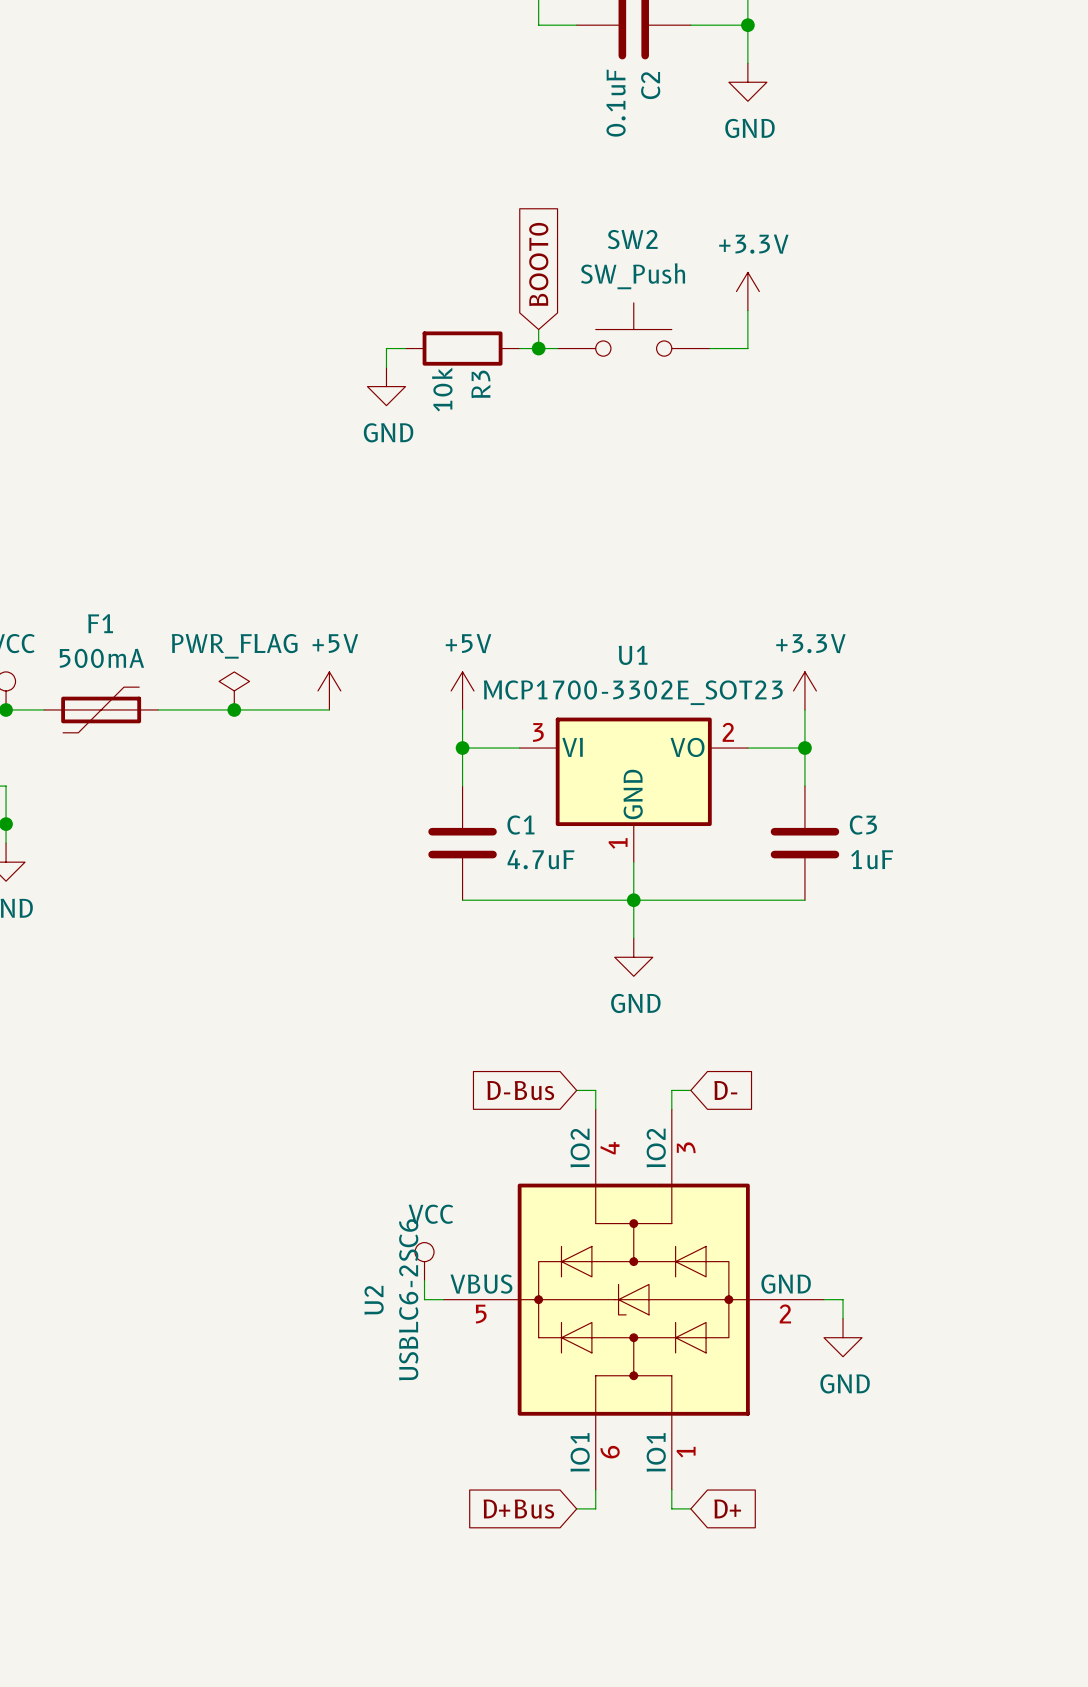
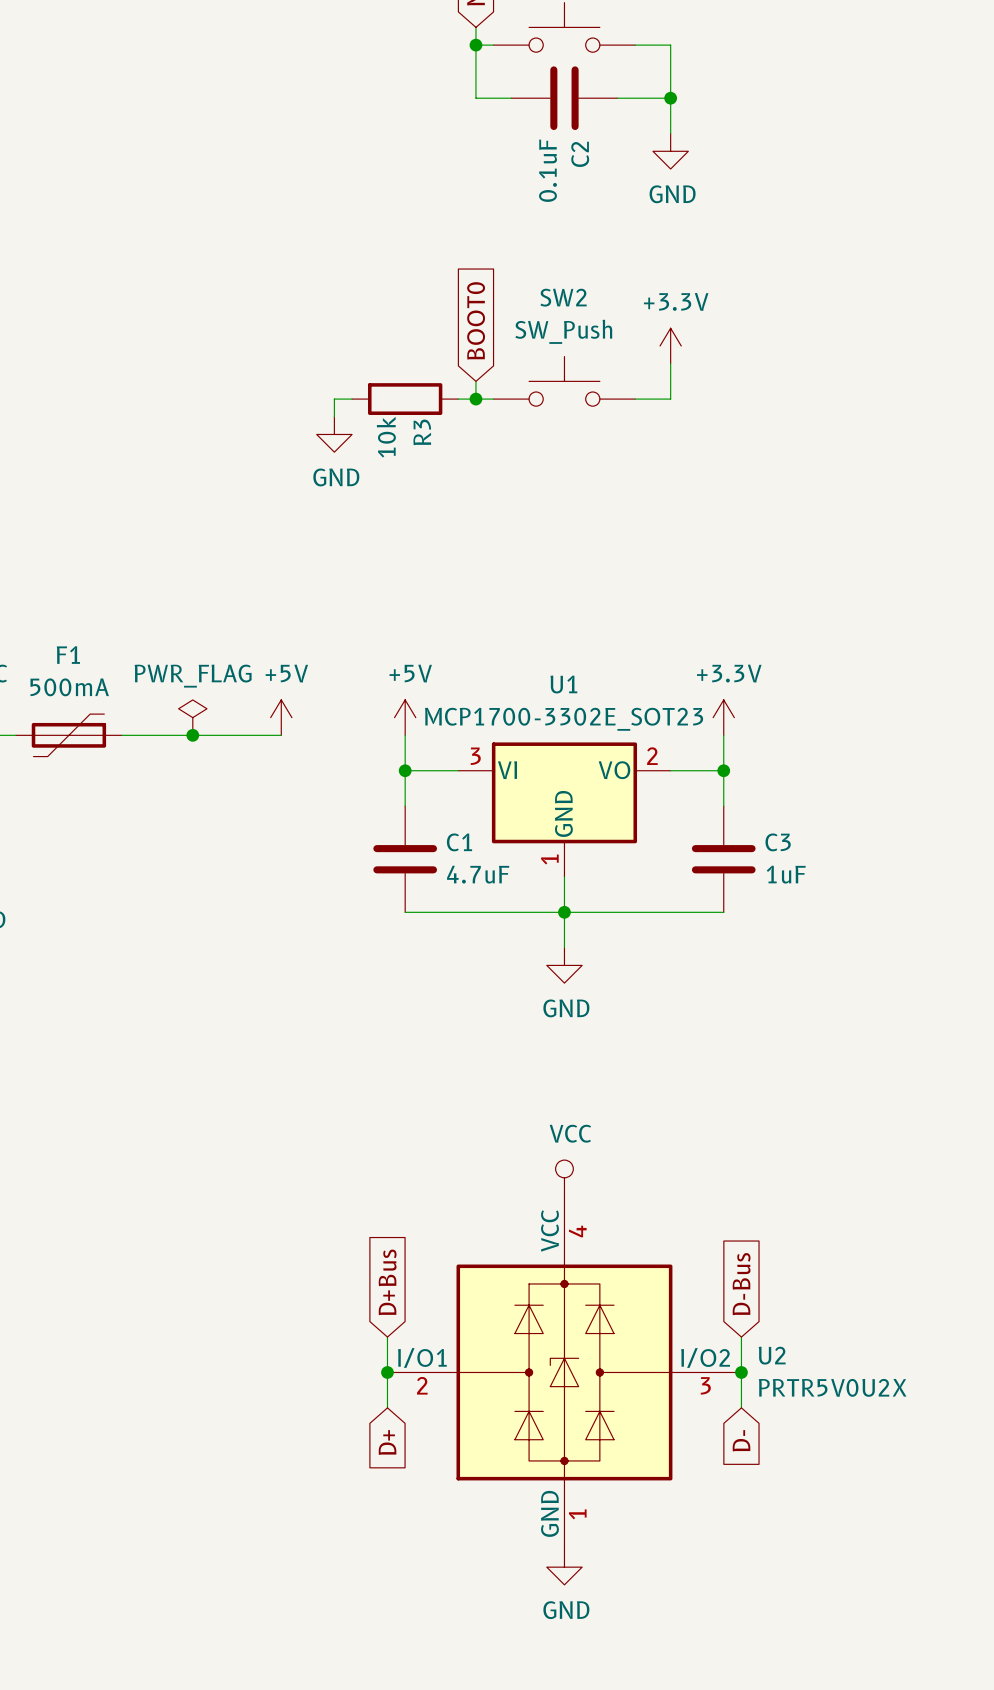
global label rotation: 0° (520, 1090) -> 90° clockwise (741, 1284)
global label position: D-Bus (520, 1090) -> D-Bus (741, 1284)
wire: (576, 1090) (595, 1090) (595, 1109) -> none
wire: (690, 1090) (671, 1090) (671, 1109) -> none
global label rotation: 0° (725, 1090) -> 90° clockwise (741, 1440)
global label position: D- (725, 1090) -> D- (741, 1440)
U2 symbol: [443, 1109, 824, 1490] -> [387, 1195, 742, 1550]
power symbol position: VCC (424, 1261) -> VCC (564, 1177)
wire: (424, 1280) (424, 1299) (443, 1299) -> none
U2 value: USBLC6-2SC6 (408, 1299) -> PRTR5V0U2X (832, 1387)
wire: (823, 1299) (843, 1299) (843, 1318) -> none
U2 name position: U2 (374, 1300) -> U2 (772, 1355)
power symbol position: GND (843, 1337) -> GND (564, 1567)
wire: none -> (387, 1337) (387, 1407)
wire: none -> (741, 1337) (741, 1407)
junction: none -> (387, 1372)
junction: none -> (741, 1372)
global label rotation: 0° (727, 1508) -> 90° clockwise (387, 1442)
global label position: D+ (727, 1508) -> D+ (387, 1442)
global label rotation: 0° (518, 1509) -> 90° clockwise (387, 1282)
global label position: D+Bus (518, 1509) -> D+Bus (387, 1282)

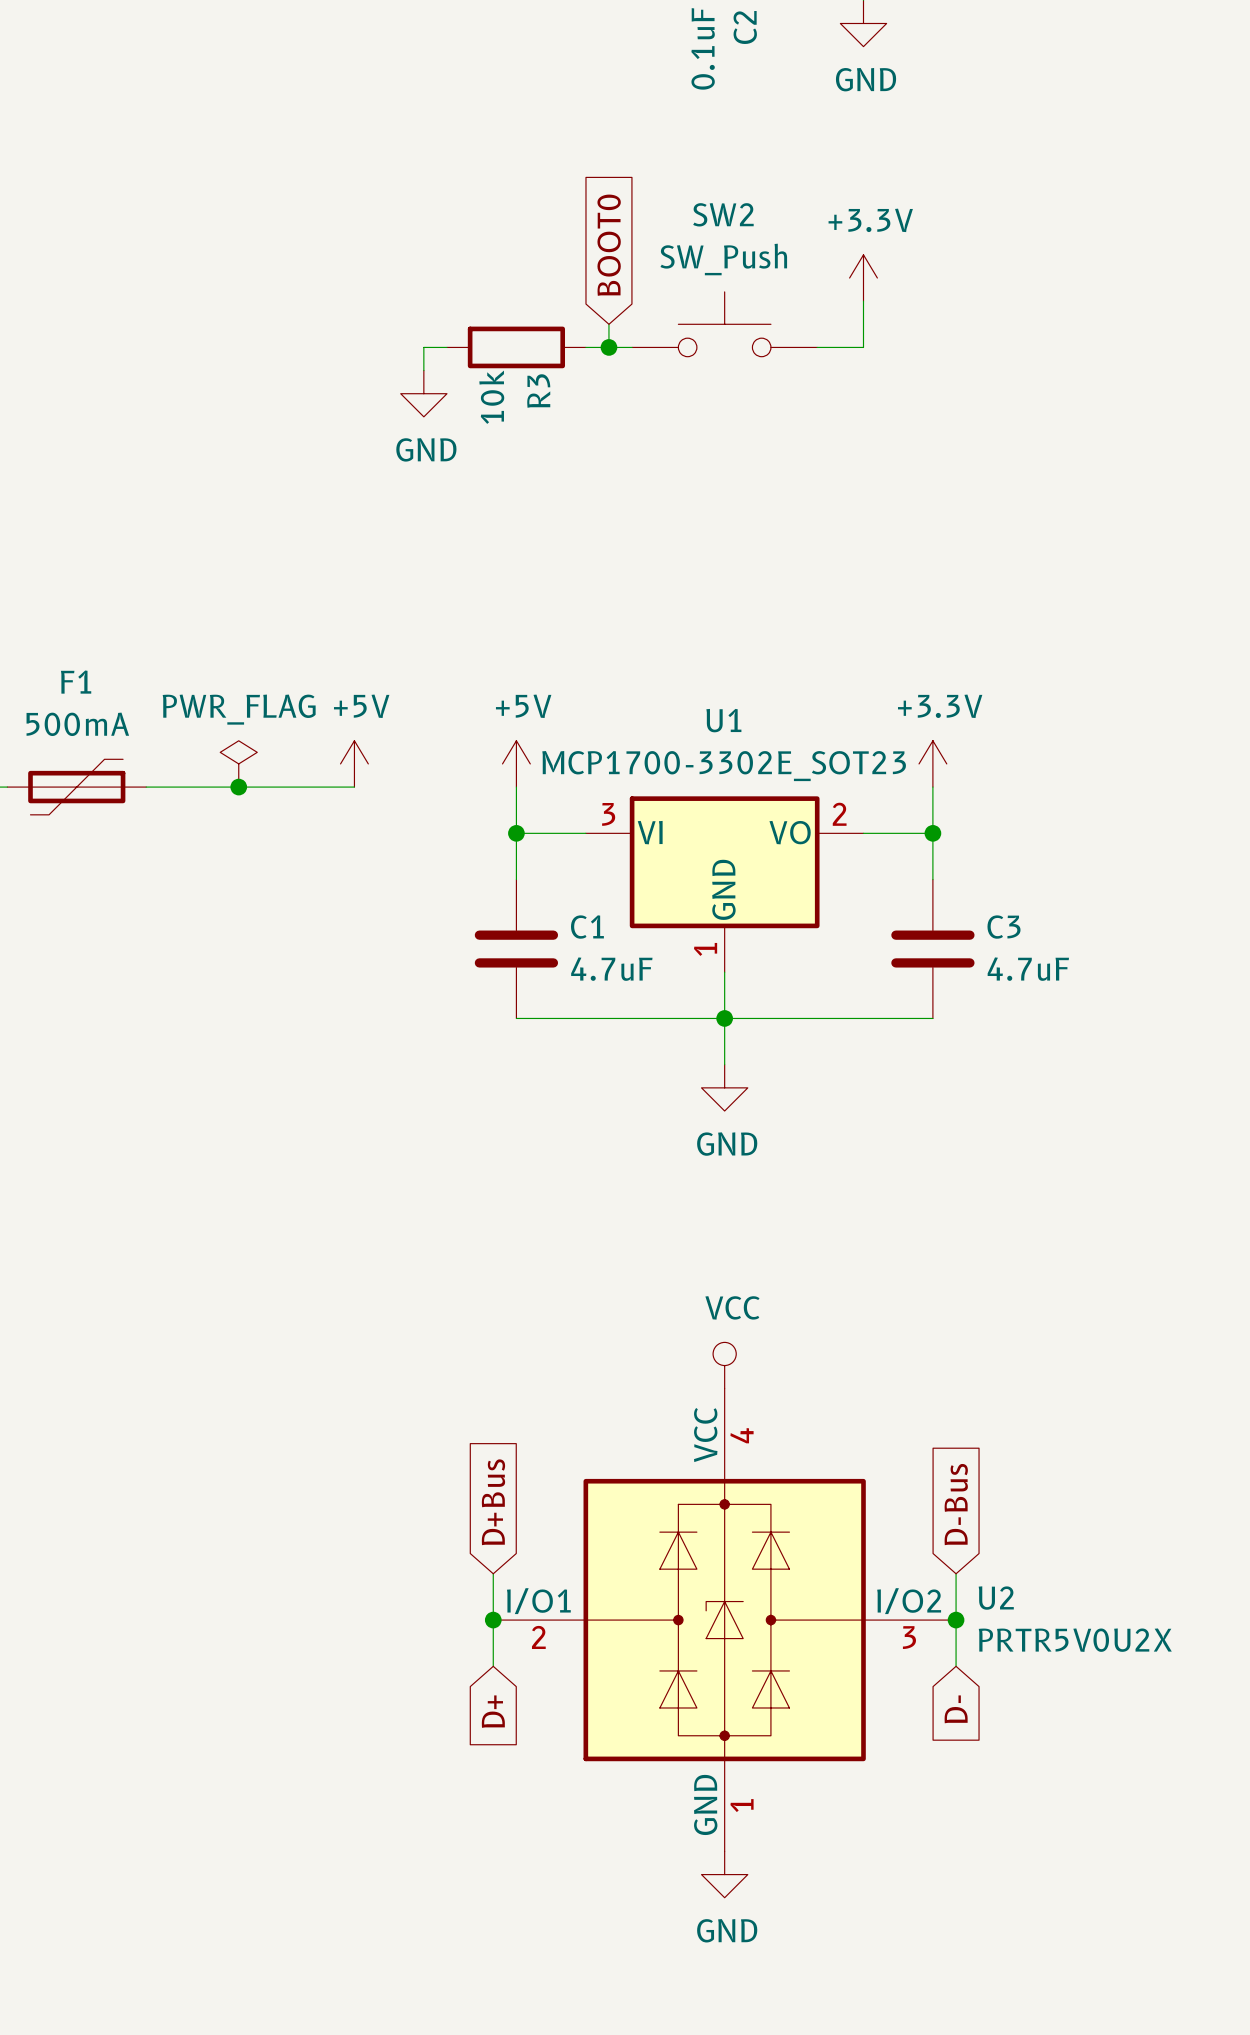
C3 value: 1uF (786, 874) -> 4.7uF (1028, 969)

